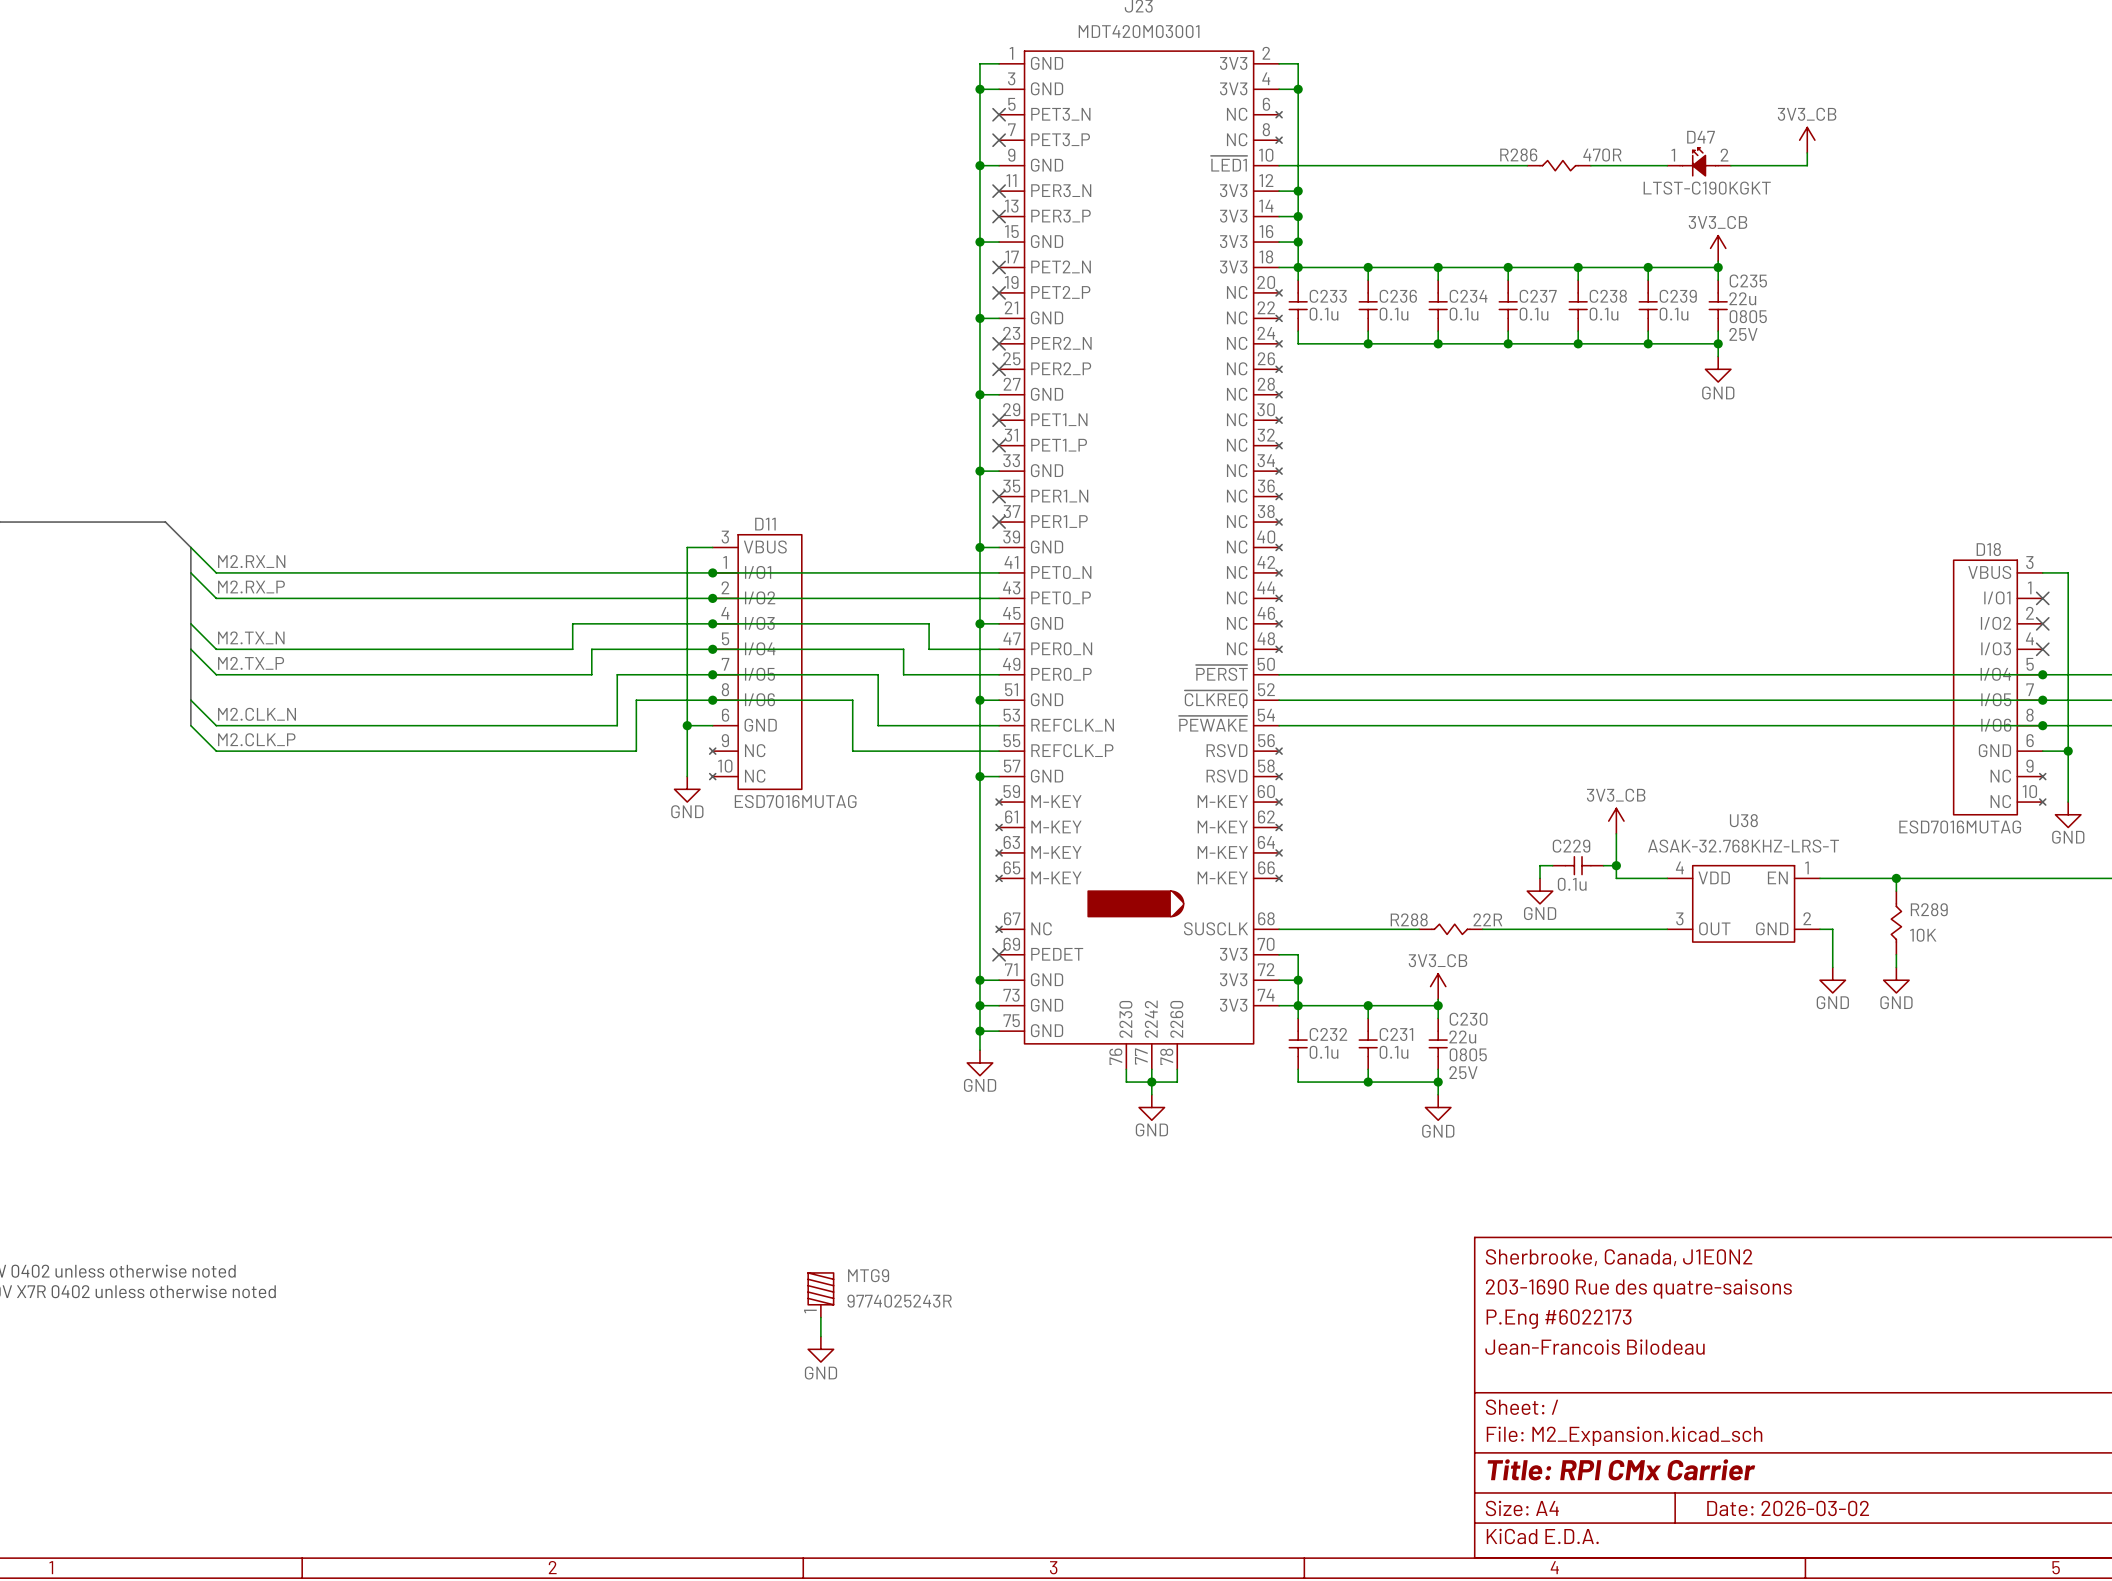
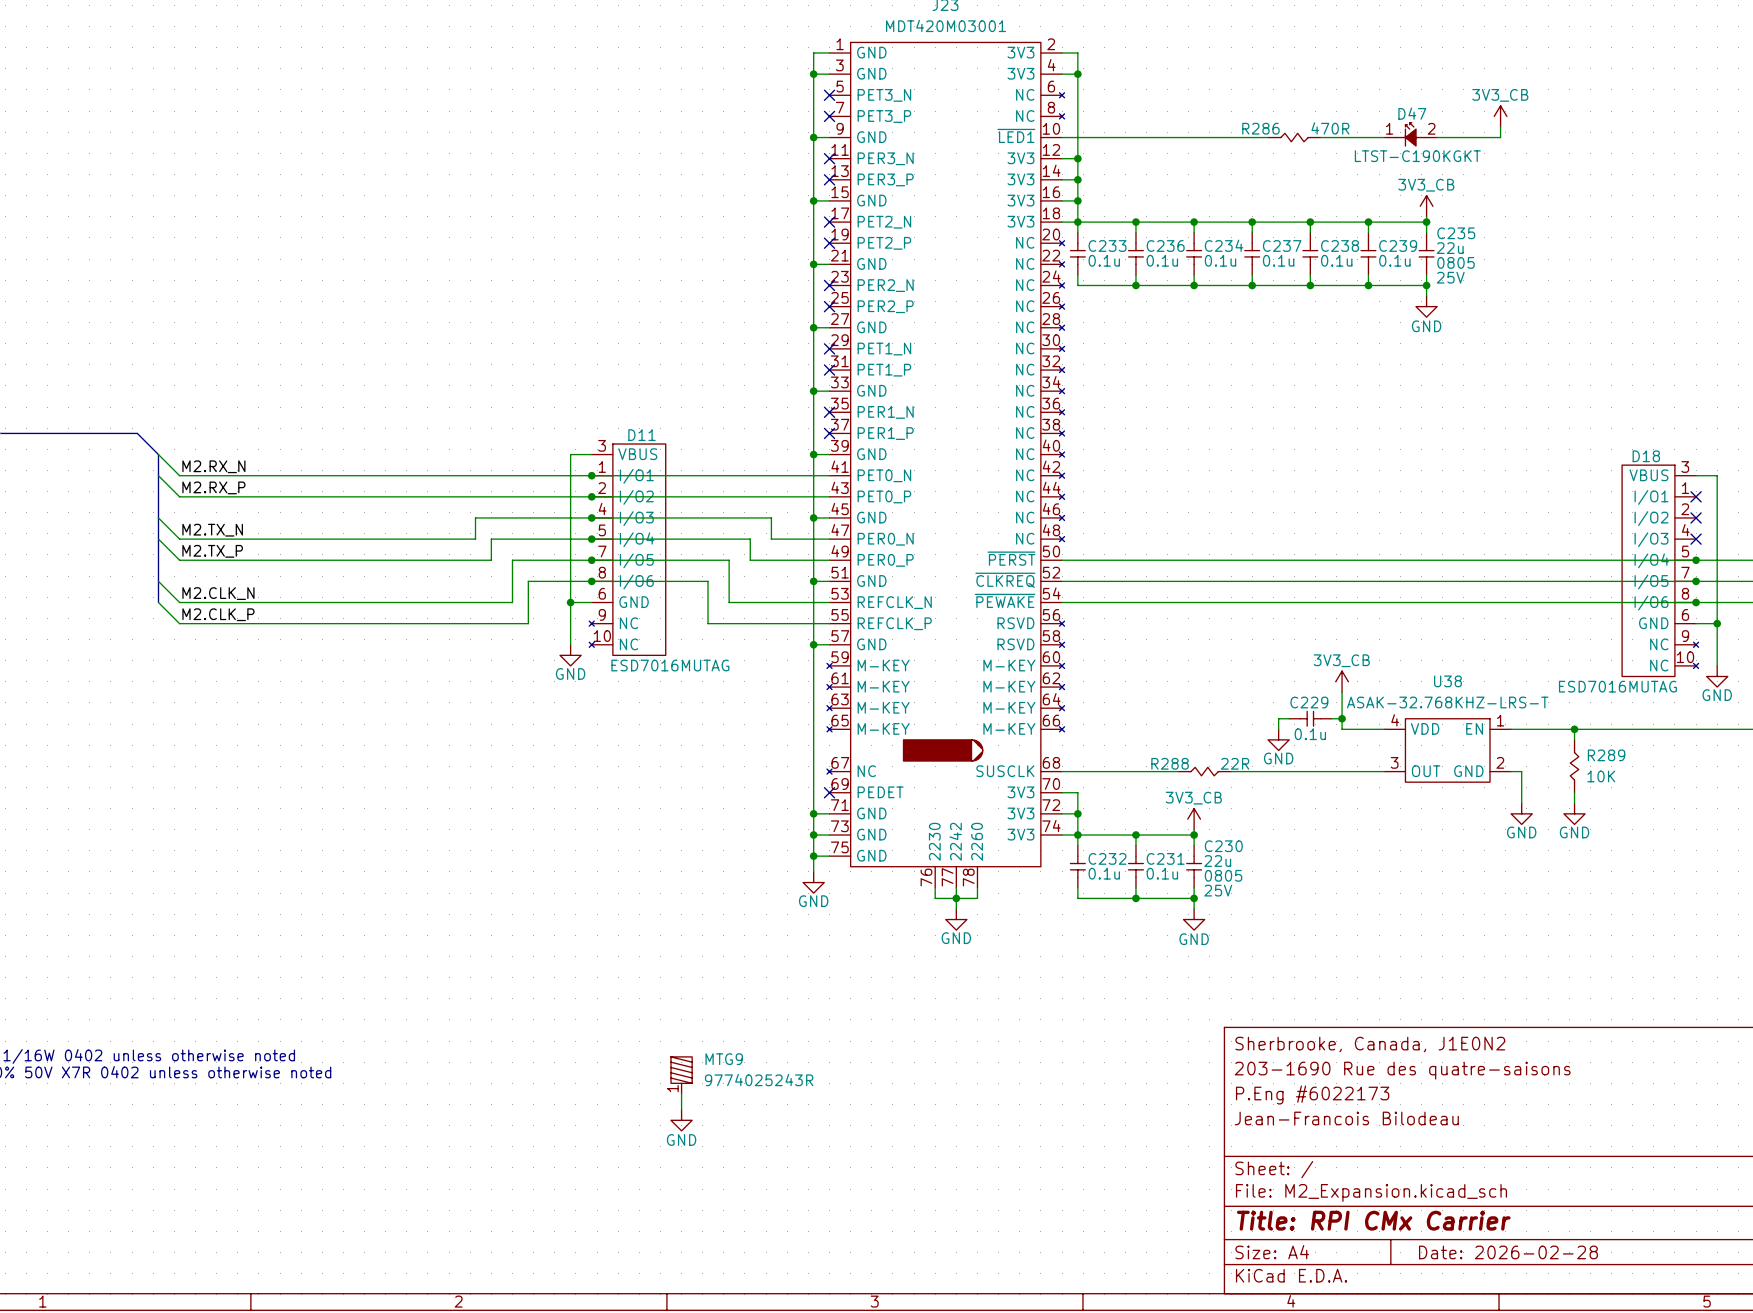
title block: Date: 2026-03-02 (1788, 1508) -> Date: 2026-02-28 (1508, 1252)

